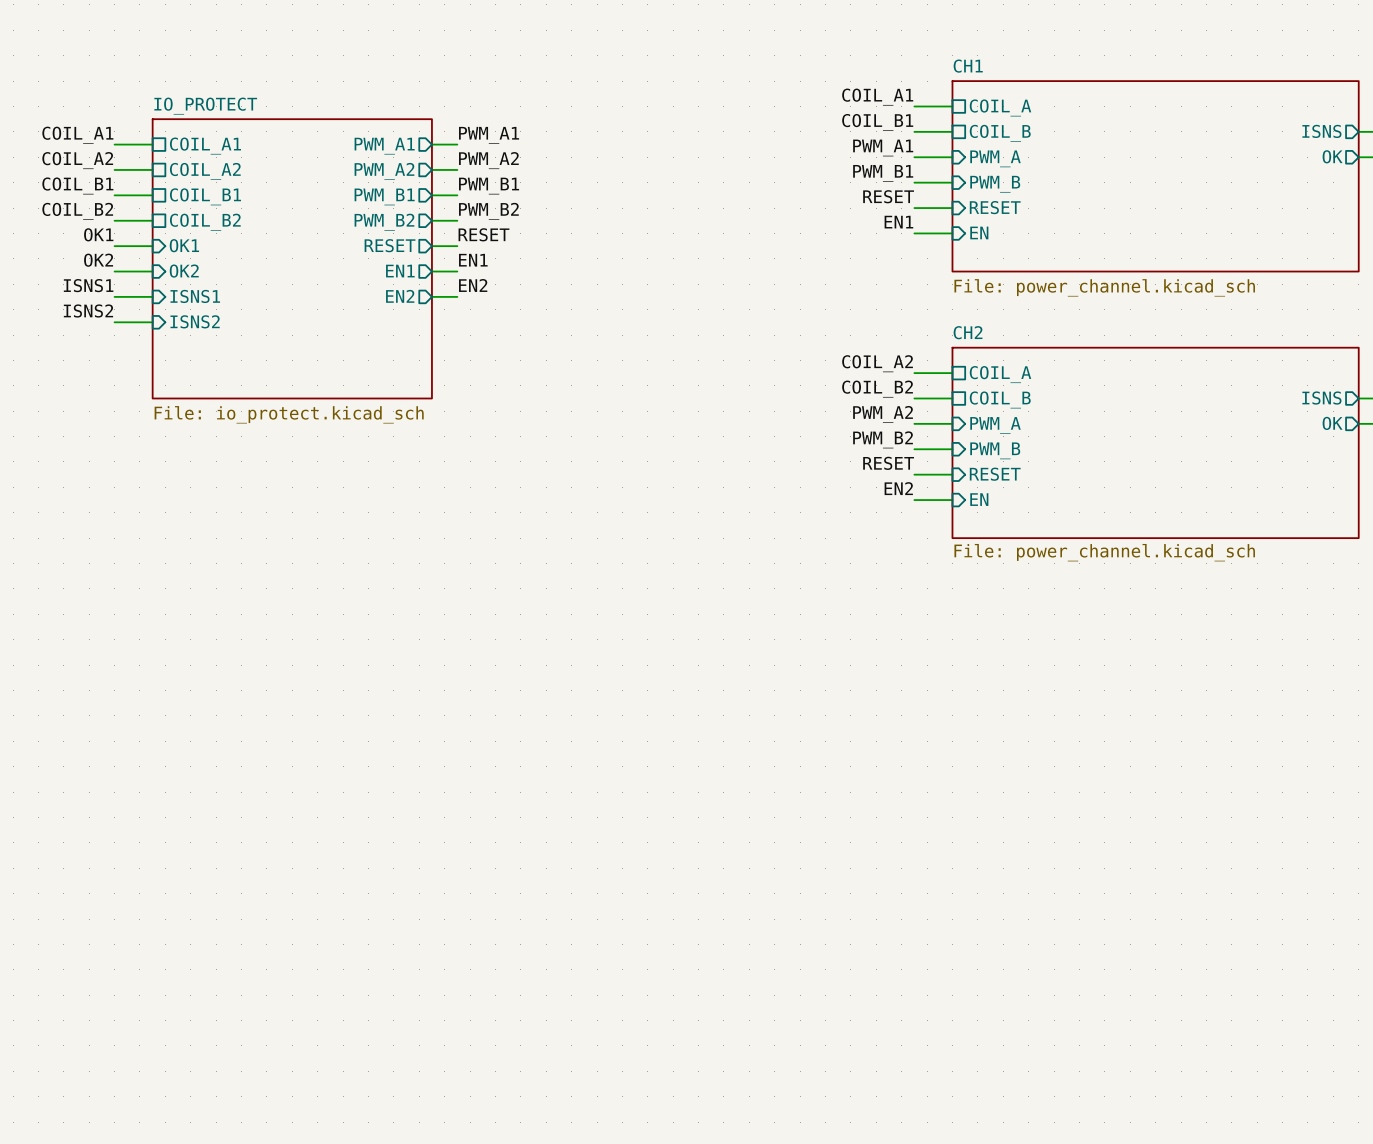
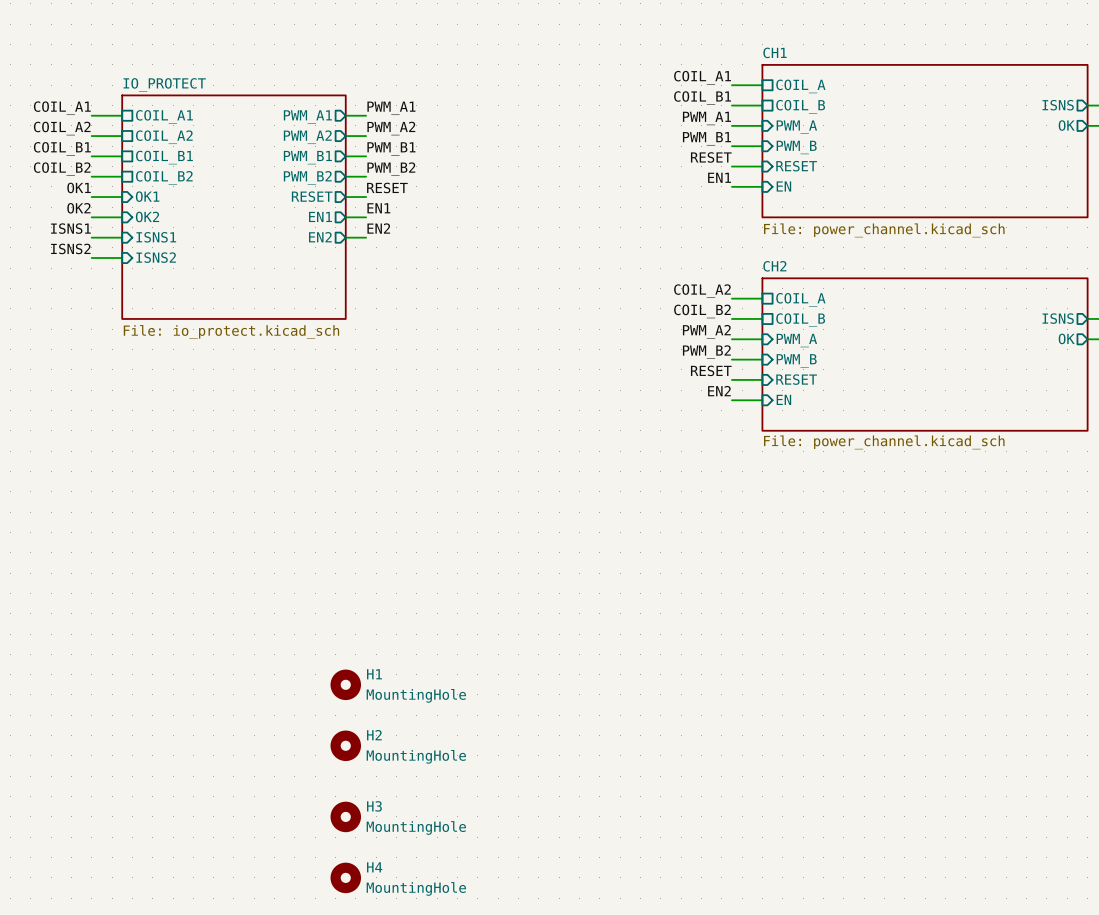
H1: none -> MountingHole (345, 684)
H2: none -> MountingHole (345, 745)
H3: none -> MountingHole (345, 816)
H4: none -> MountingHole (345, 877)

